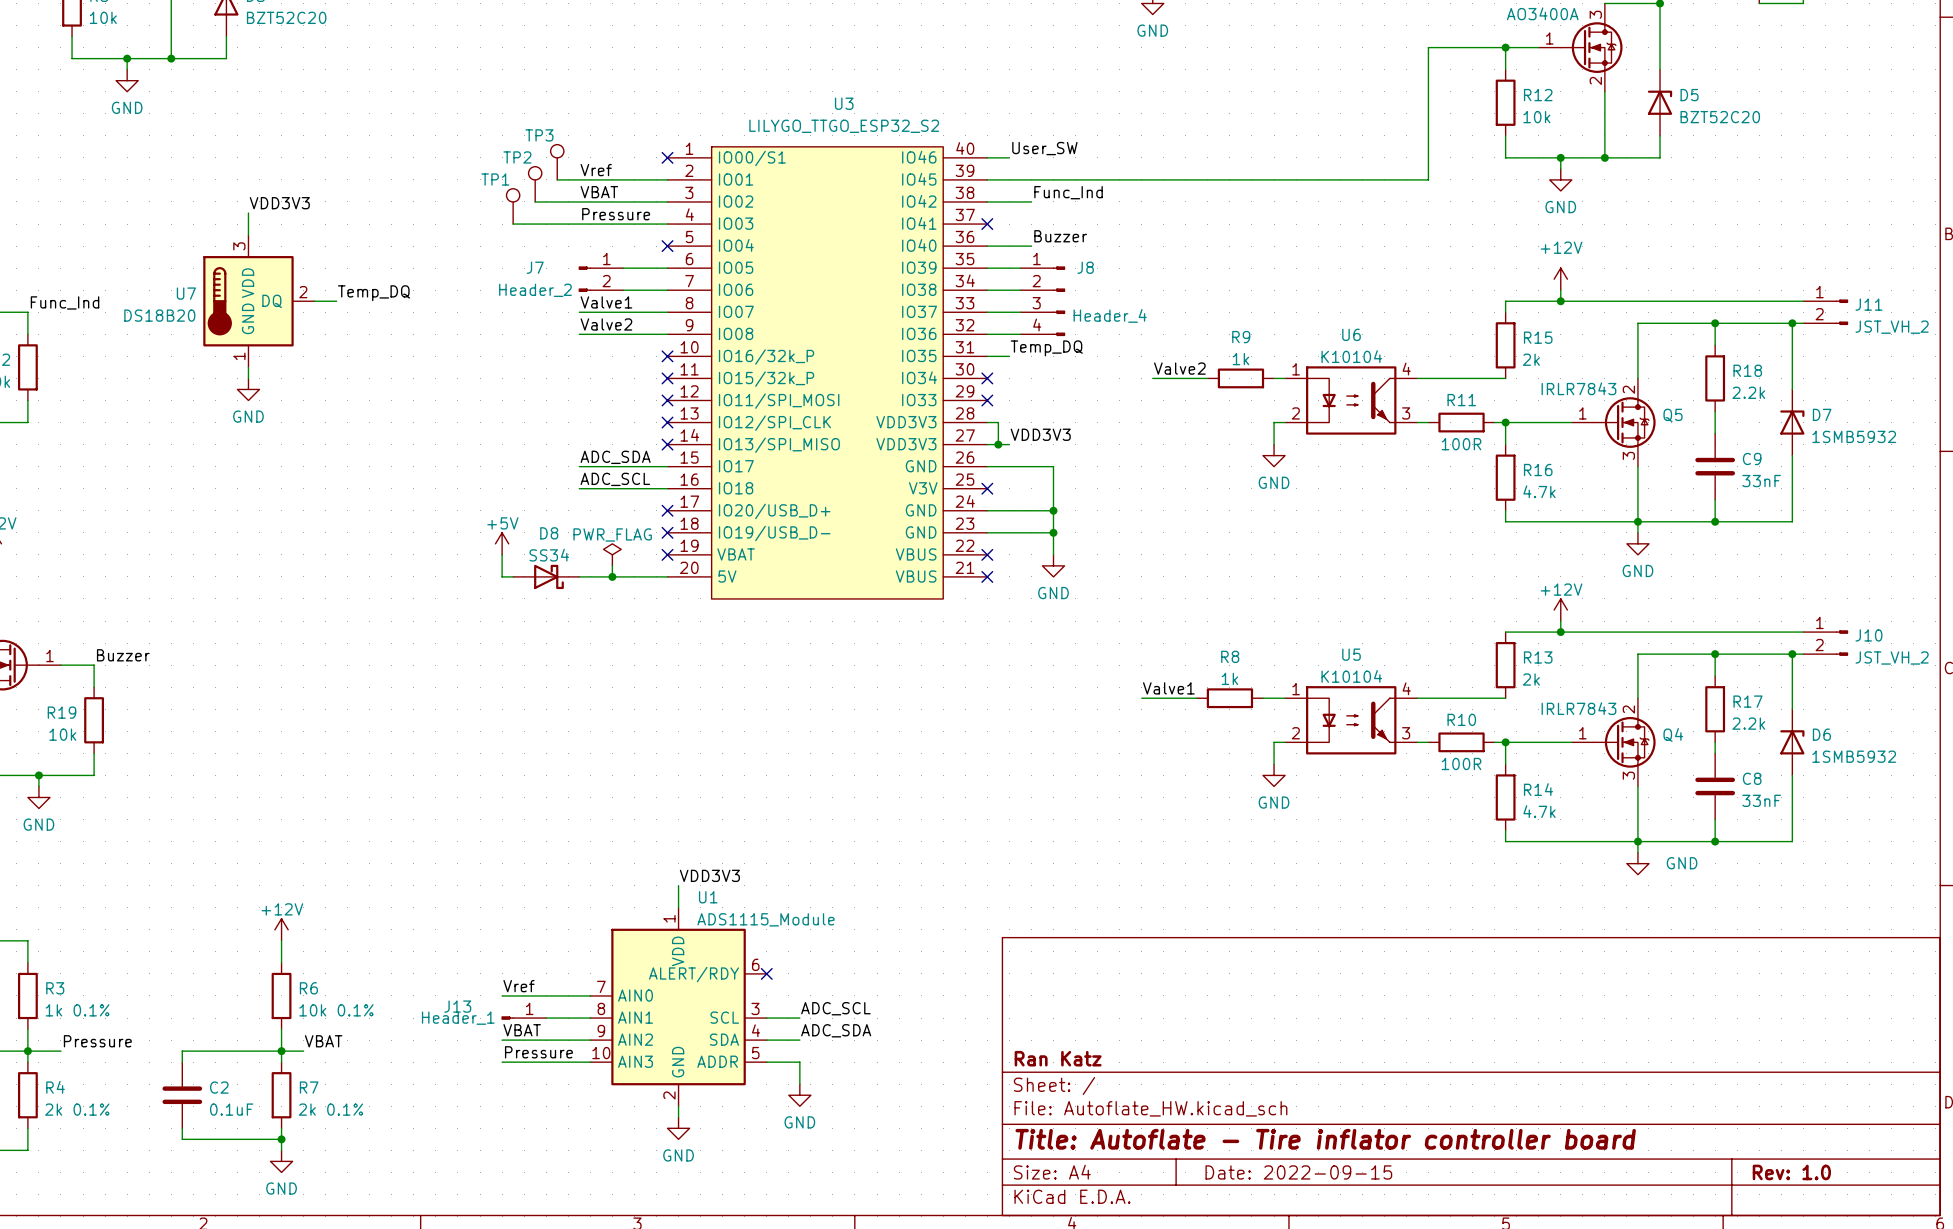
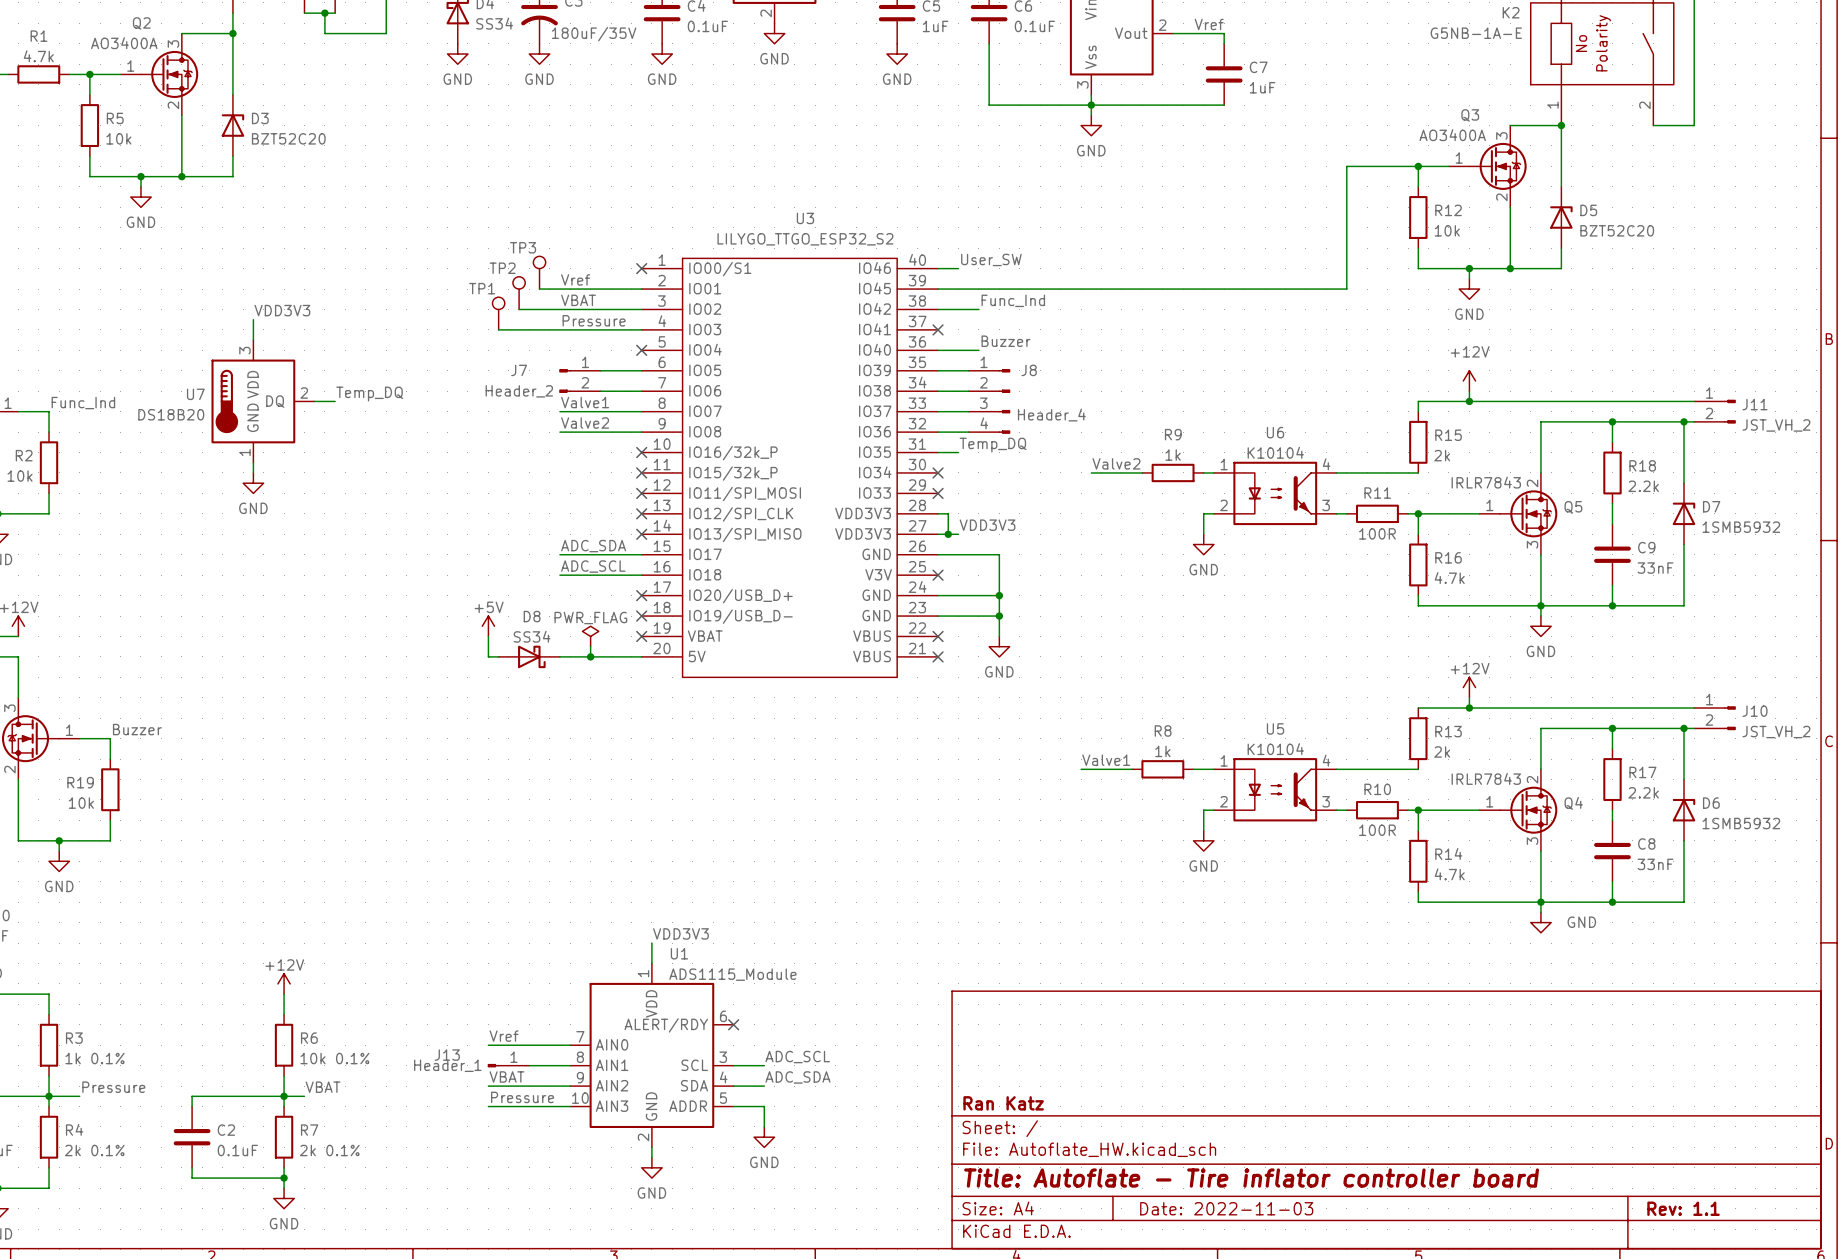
title block: Date: 2022-09-15 (1298, 1172) -> Date: 2022-11-03 (1226, 1208)
title block: Rev: 1.0 (1791, 1172) -> Rev: 1.1 (1683, 1208)

